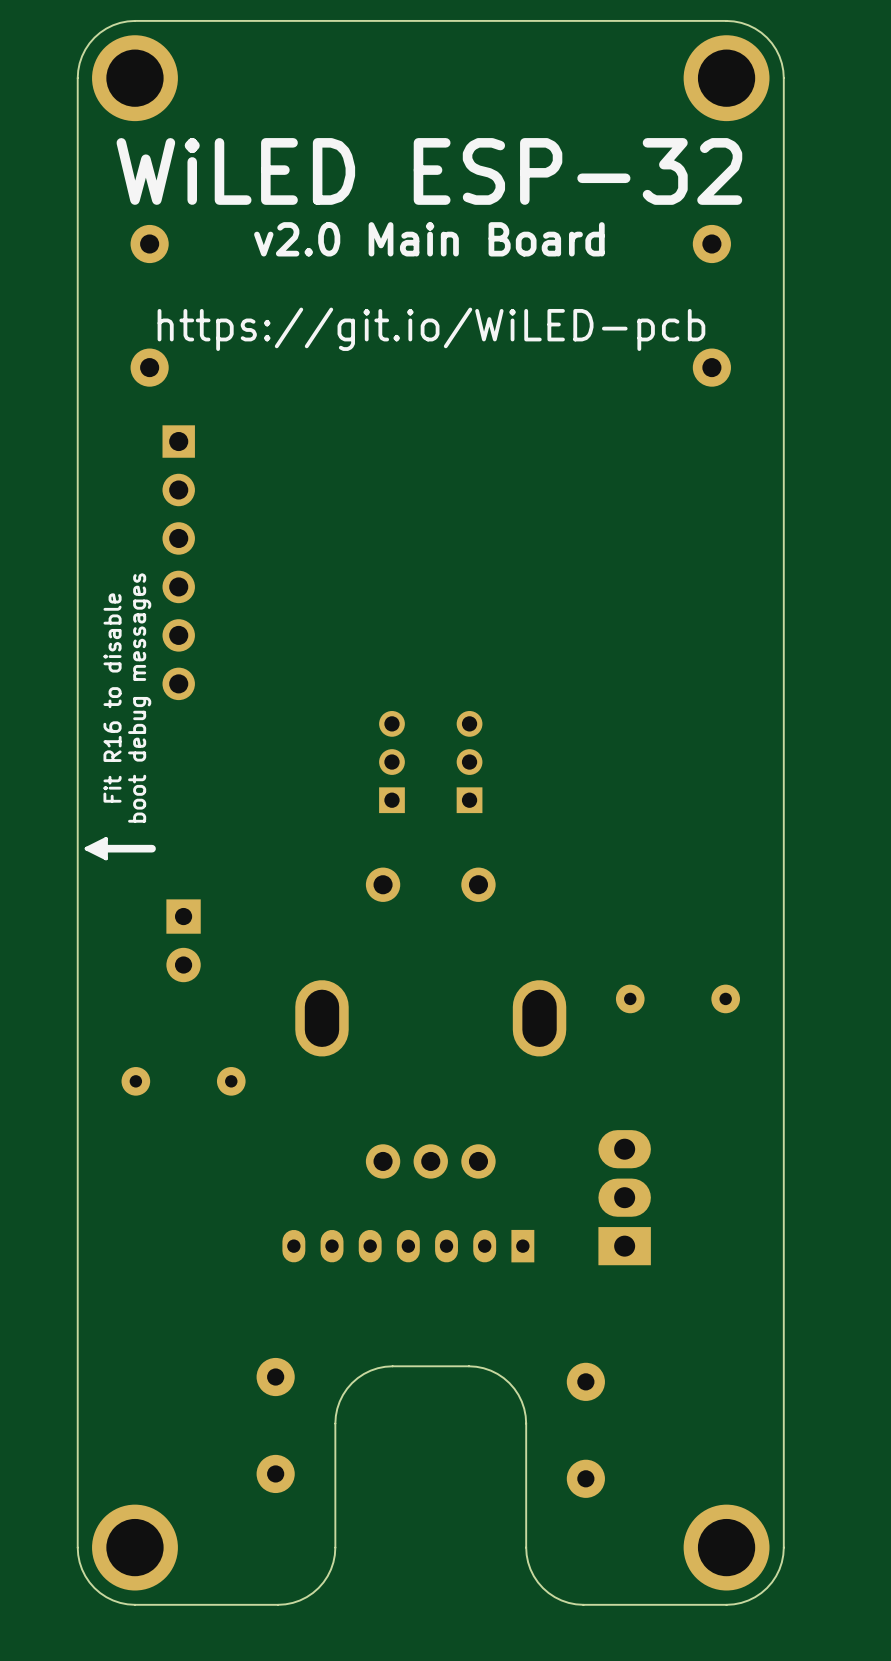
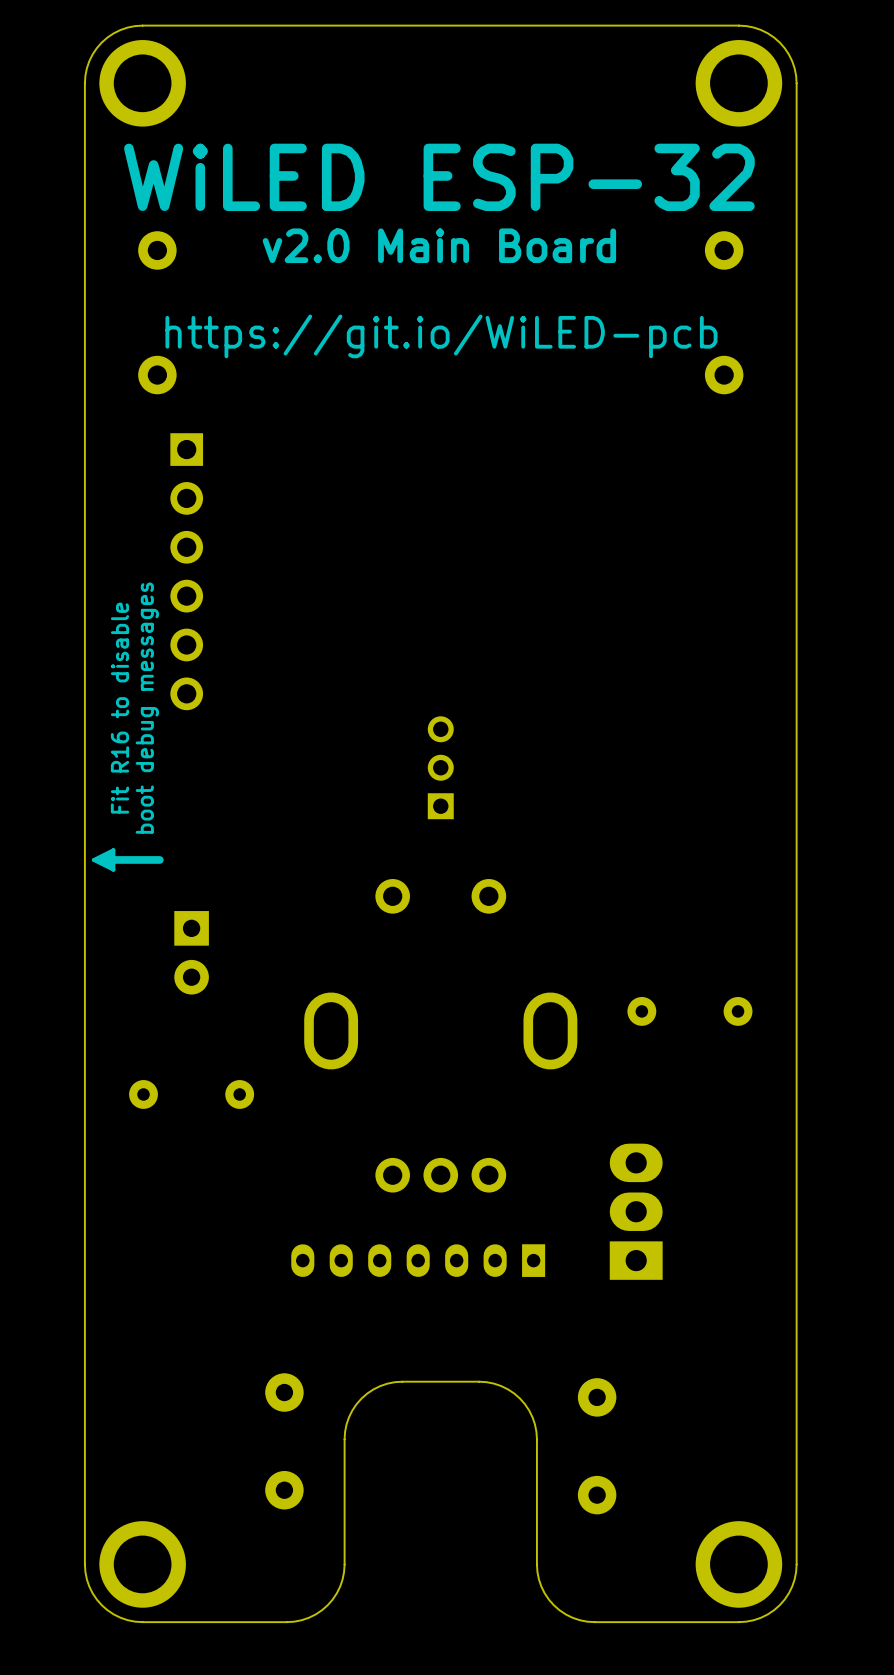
part: none -> (440, 767)
part: (391, 762) -> none
part: (469, 762) -> none

